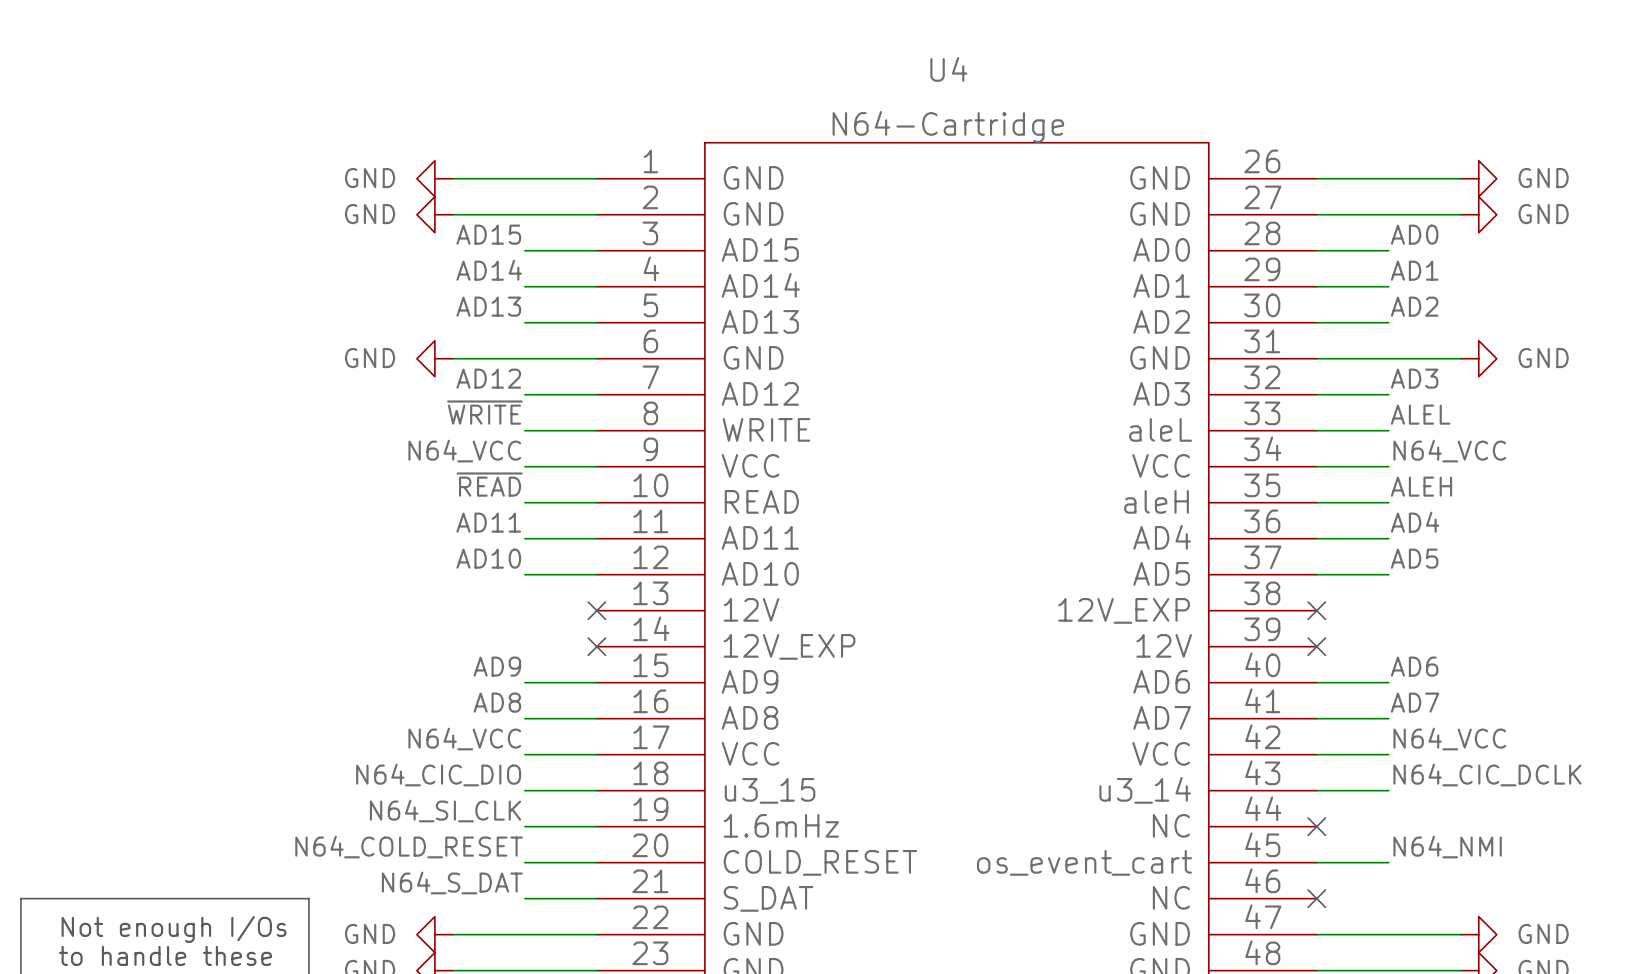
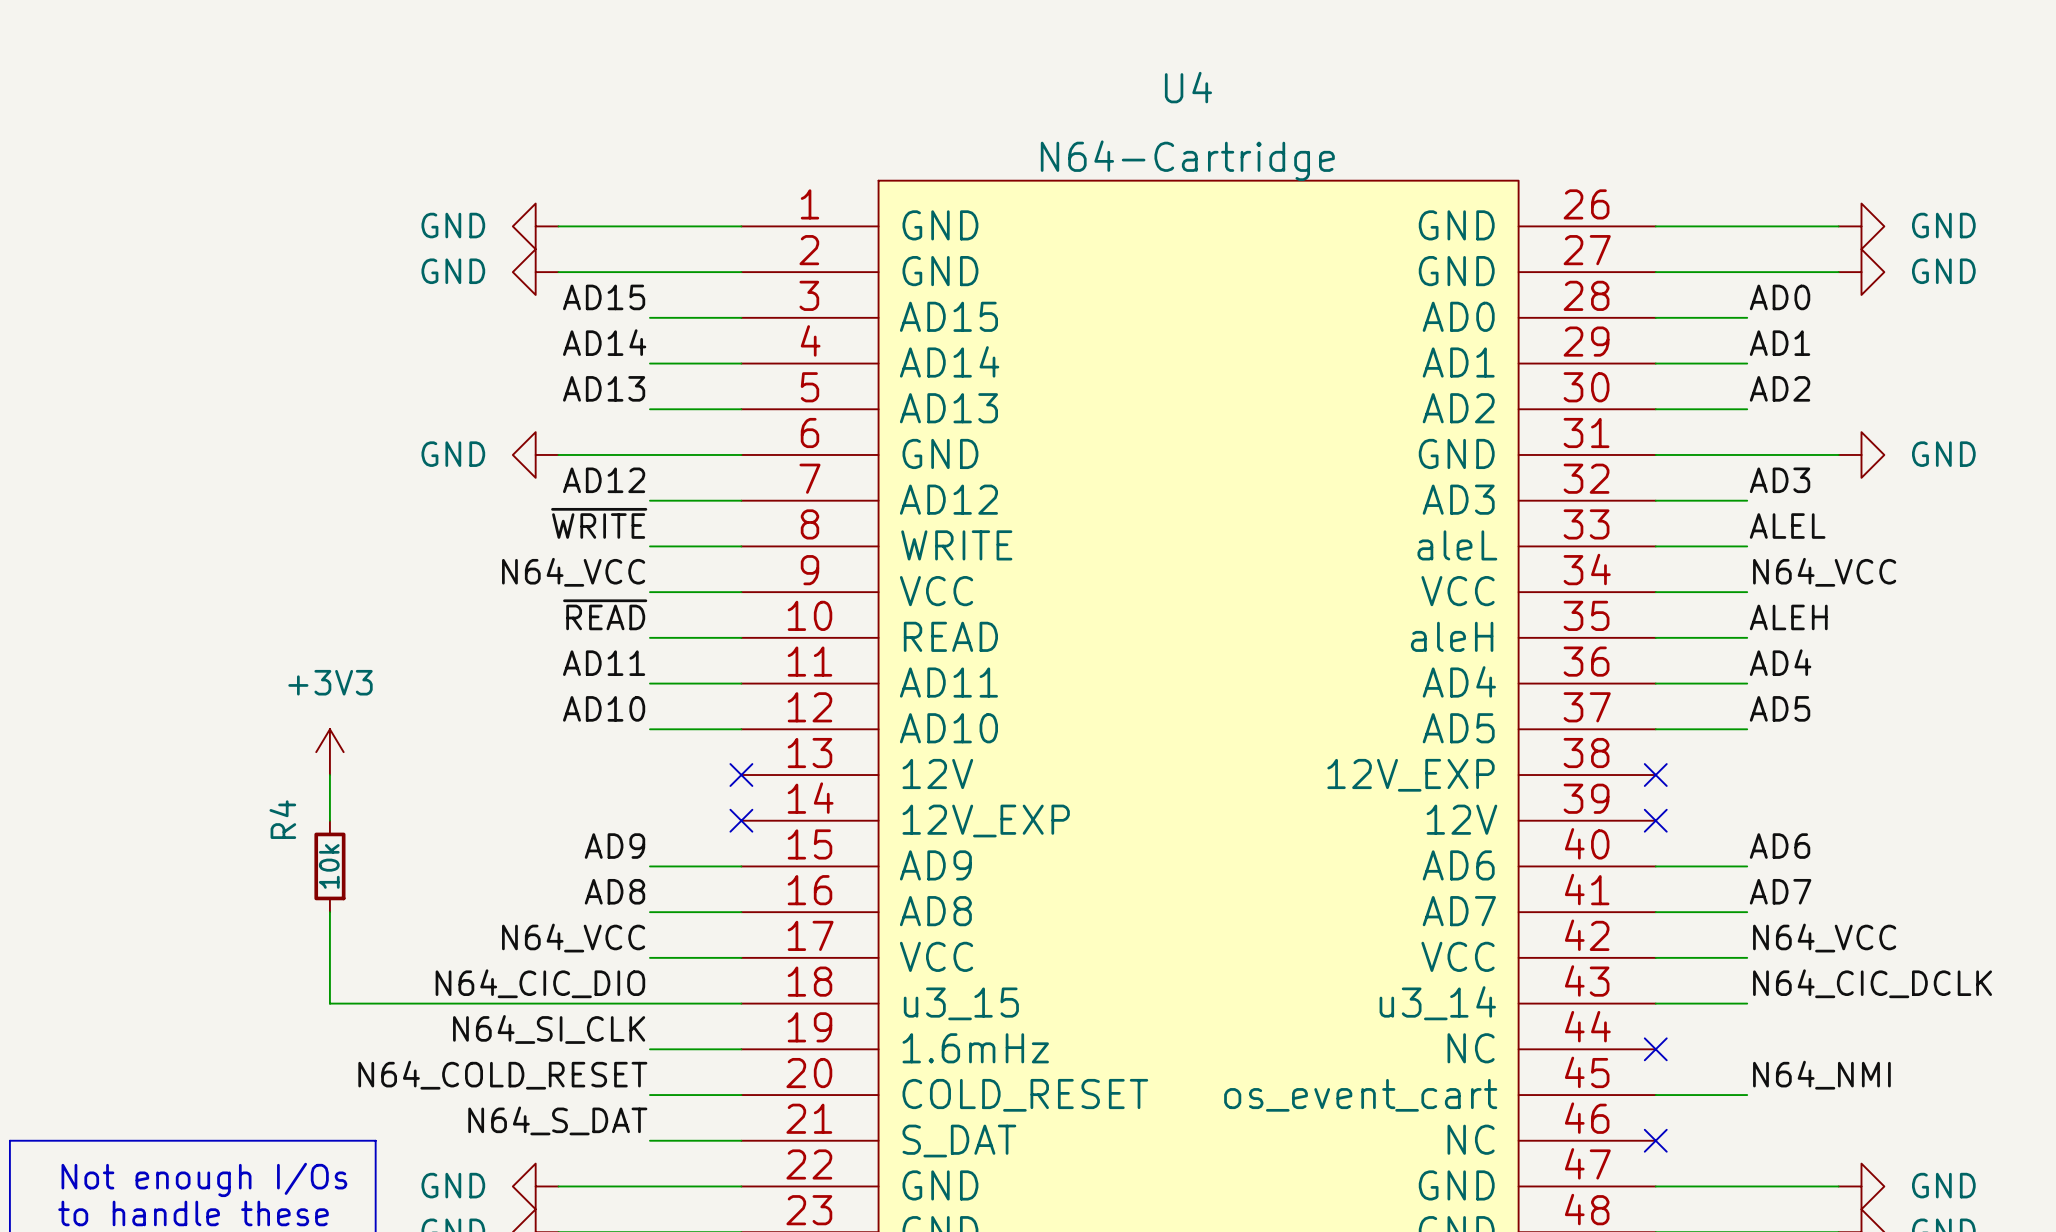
power symbol: none -> +3V3 (329, 752)
wire: none -> (329, 775) (329, 820)
R4: none -> 10k (329, 866)
wire: none -> (329, 912) (329, 1003) (649, 1003)

